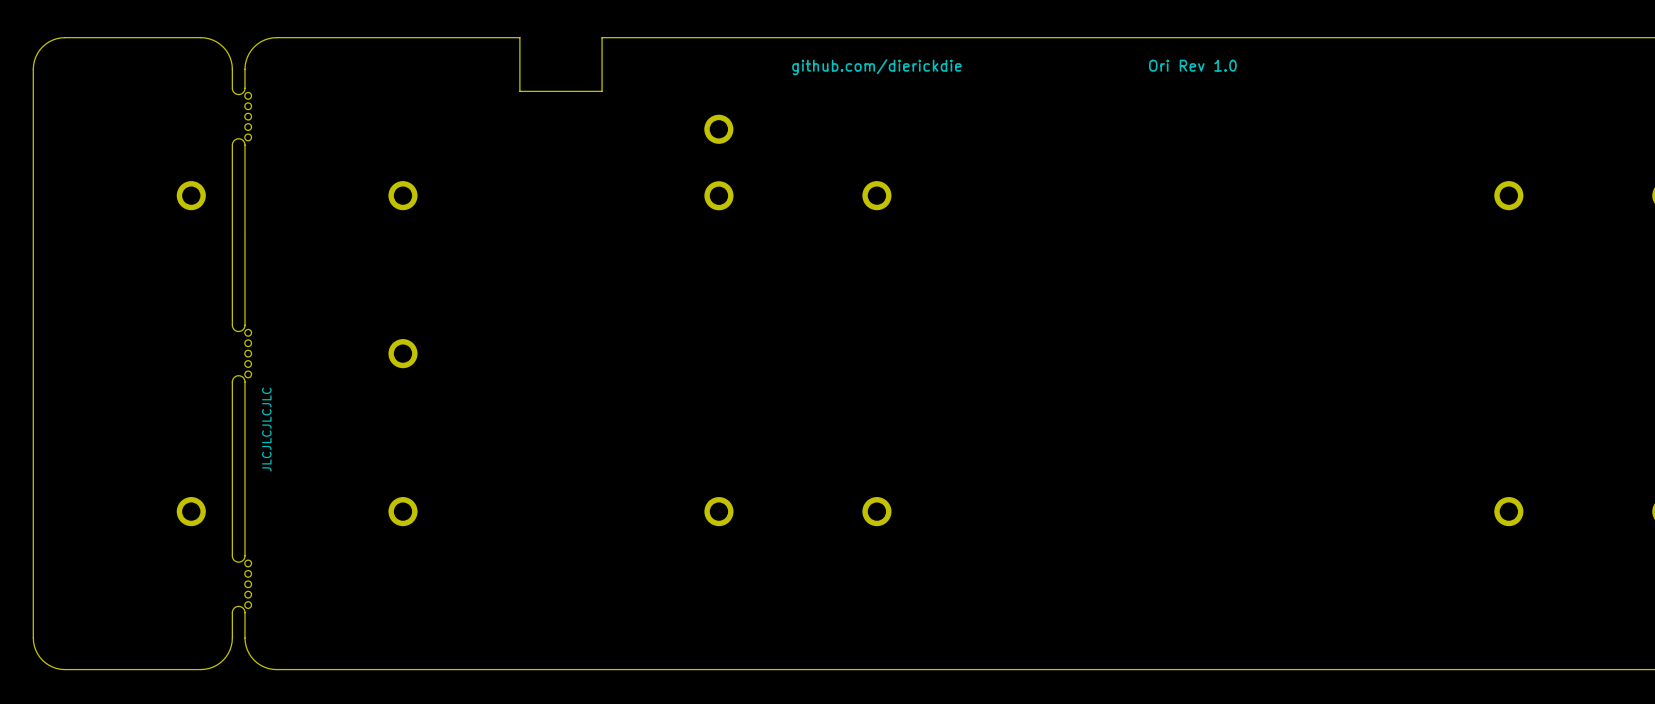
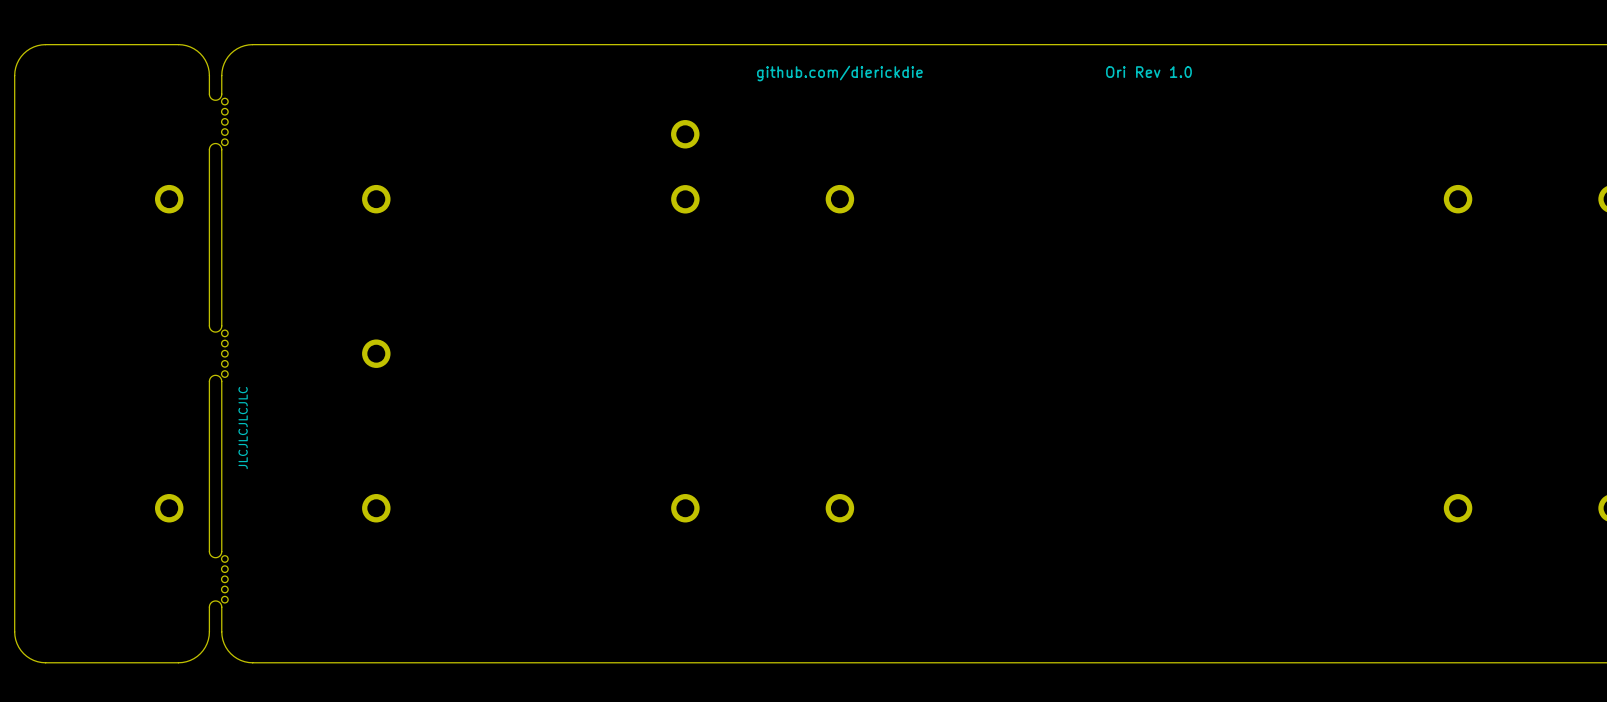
board edge: (519, 37) (519, 91) (602, 91) (602, 37) -> (490, 44) (571, 44)

